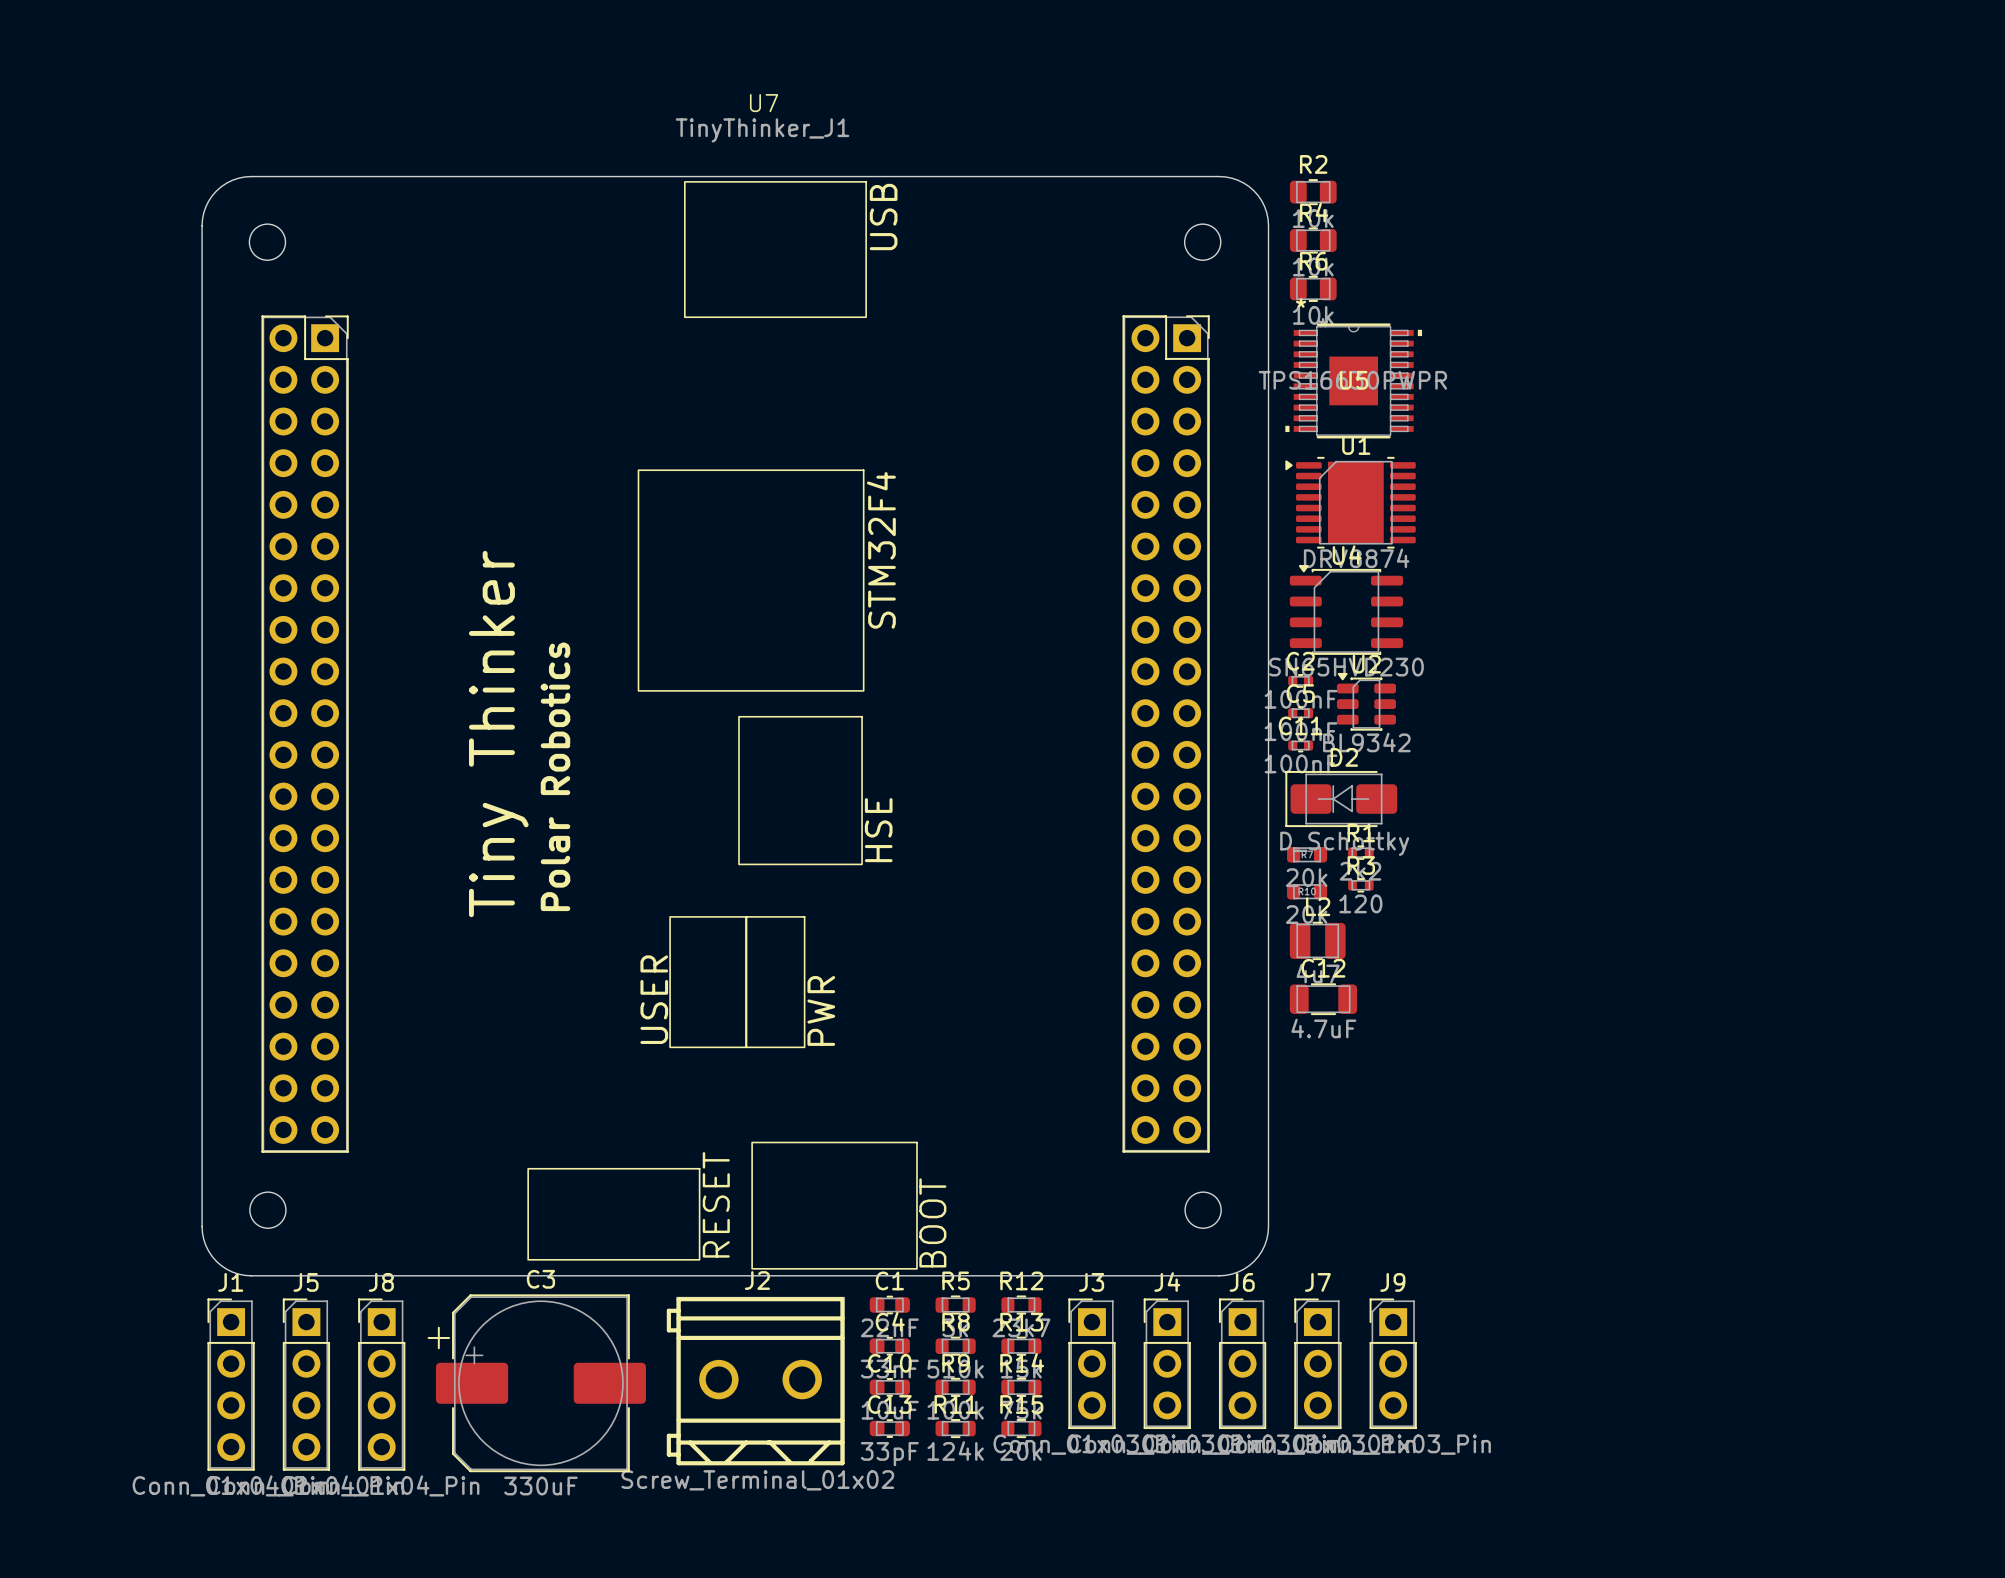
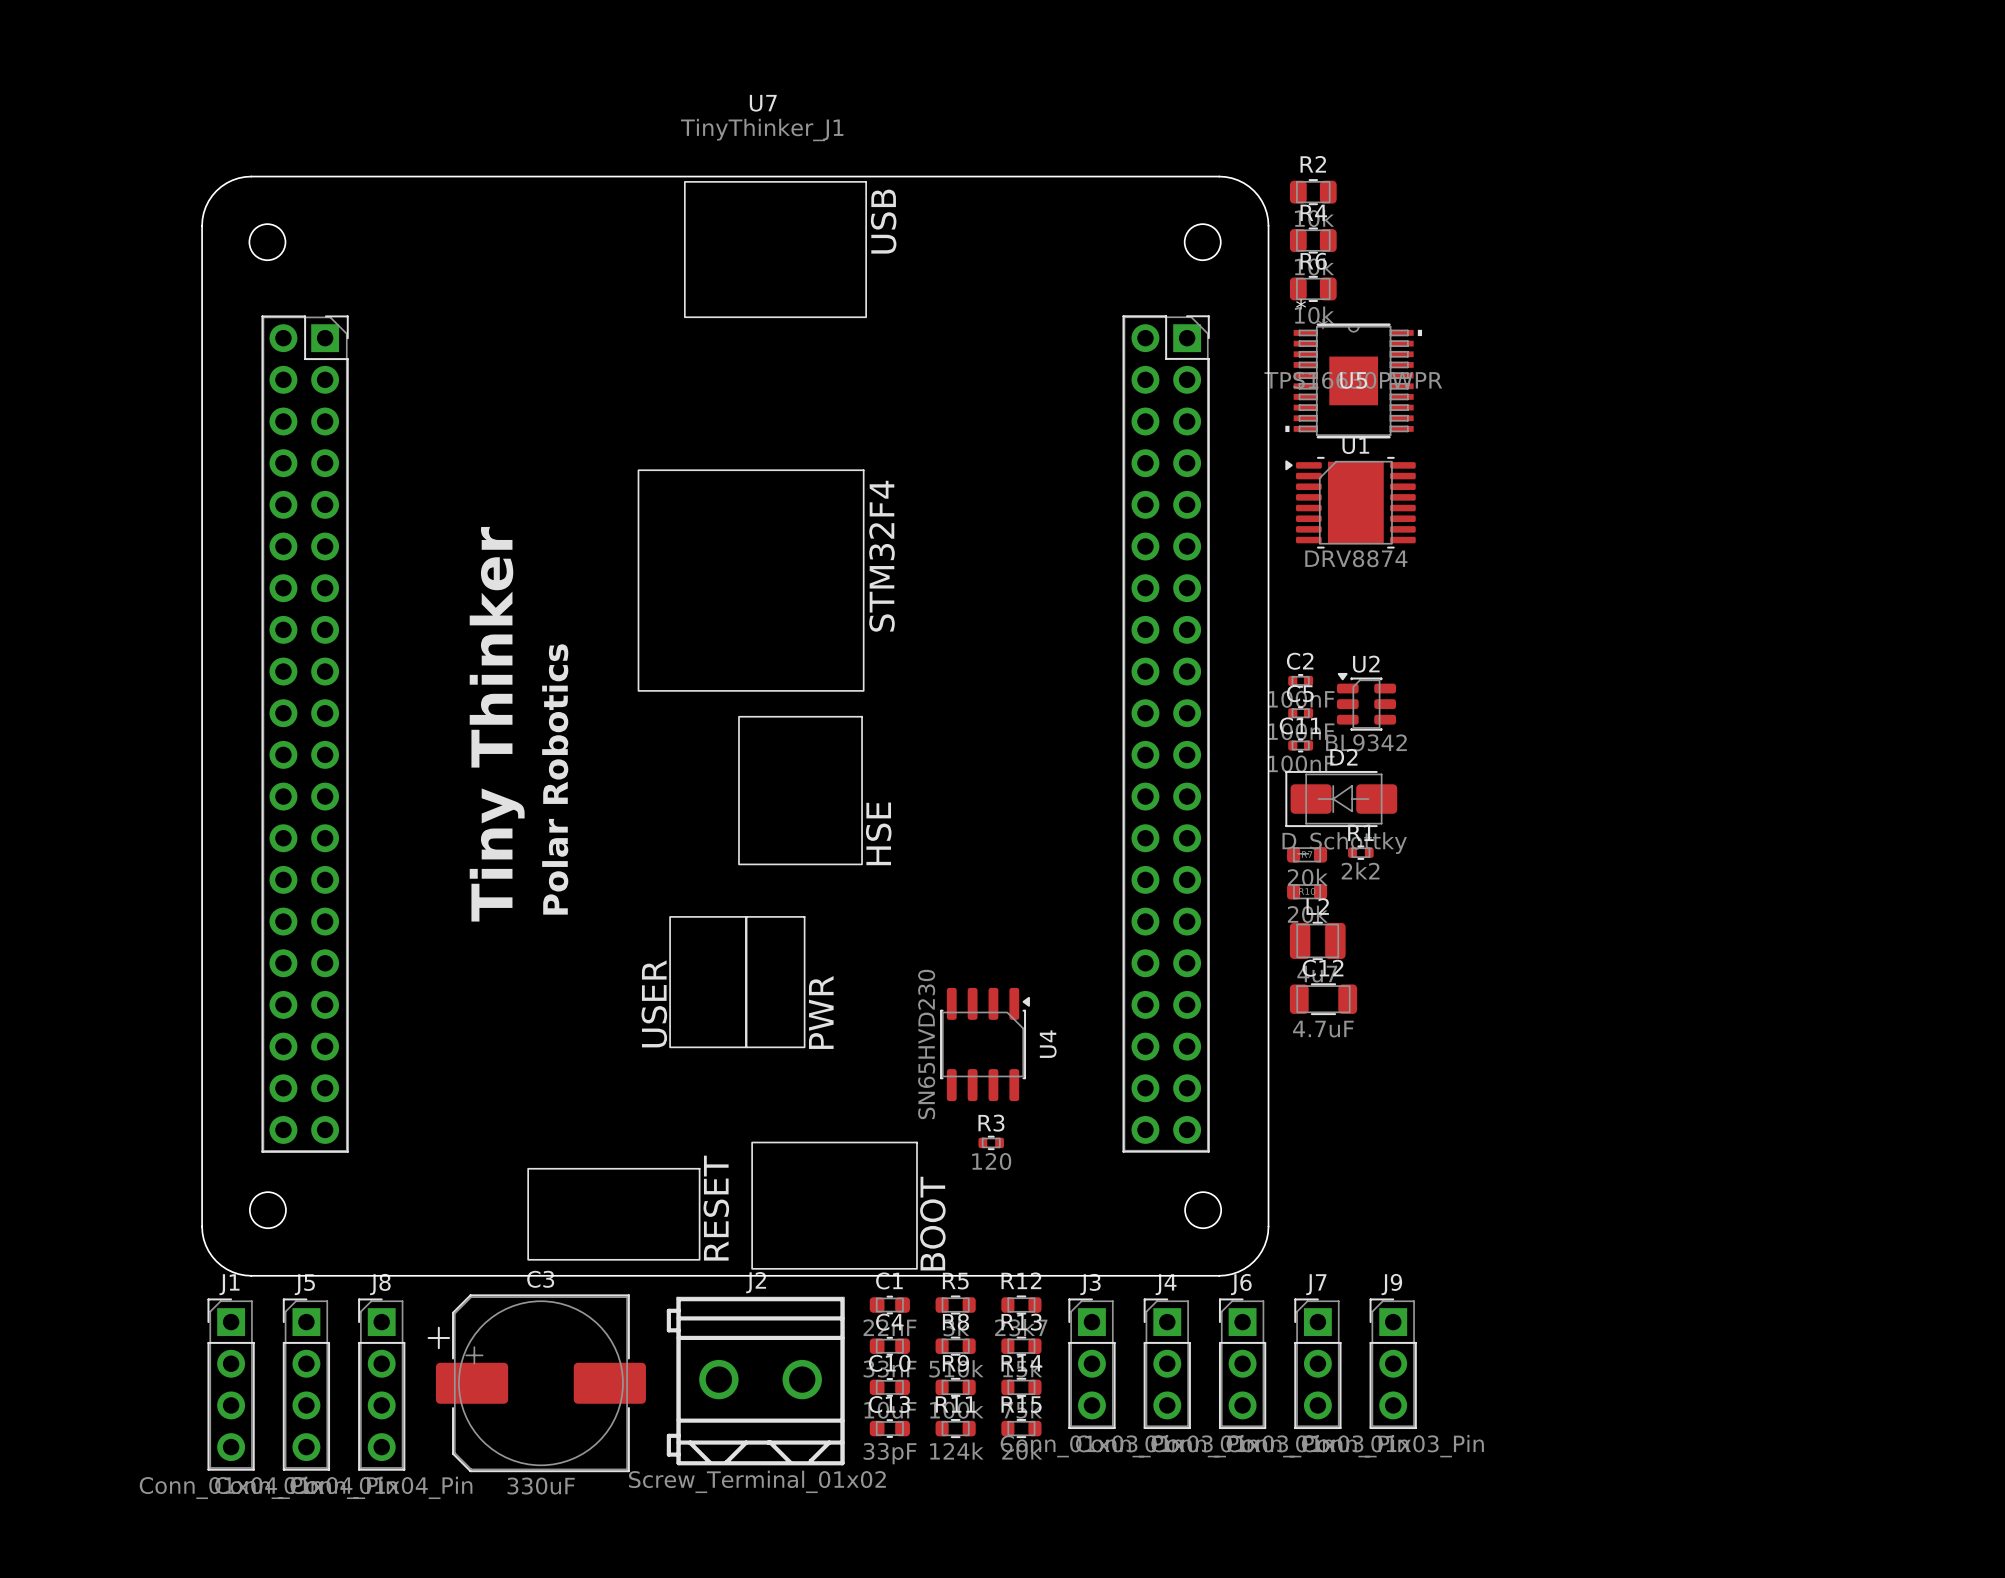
U4 rotation: 0° (1346, 609) -> 90° clockwise (985, 1044)
U4 position: (1346, 609) -> (985, 1044)
R3 position: (1360, 885) -> (991, 1142)

